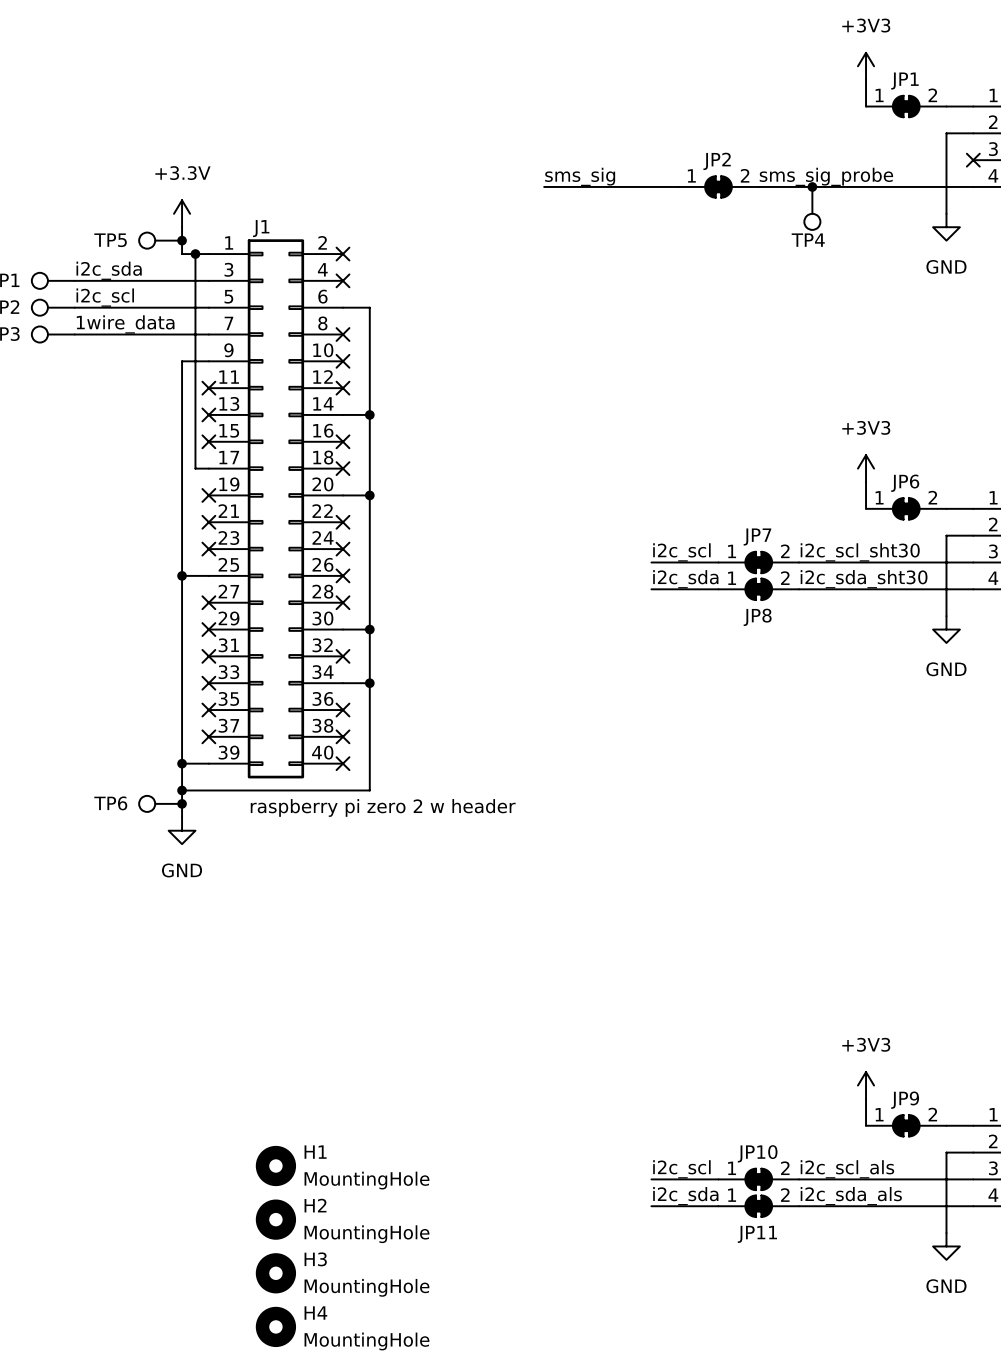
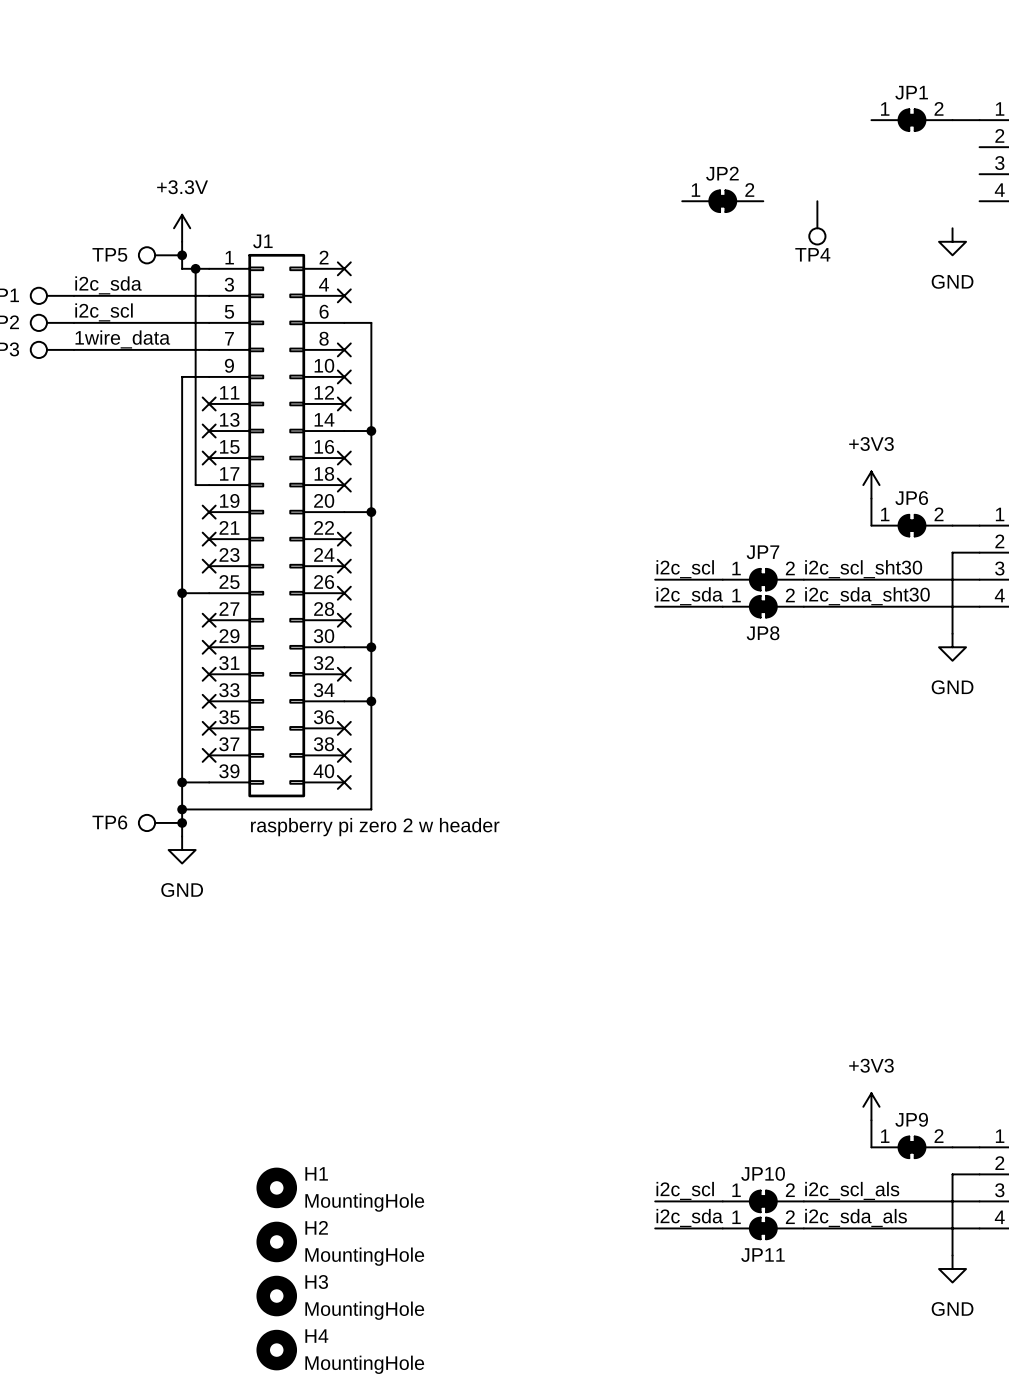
power symbol: +3V3 (866, 66) -> none
wire: (866, 79) (866, 106) -> none
wire: (973, 133) (946, 133) (946, 213) -> none
no-connect mark: (973, 160) -> none
label: sms_sig (580, 176) -> none
label: sms_sig_probe (826, 176) -> none
wire: (544, 186) (678, 186) -> none
wire: (758, 186) (973, 186) -> none
junction: (812, 186) -> none

